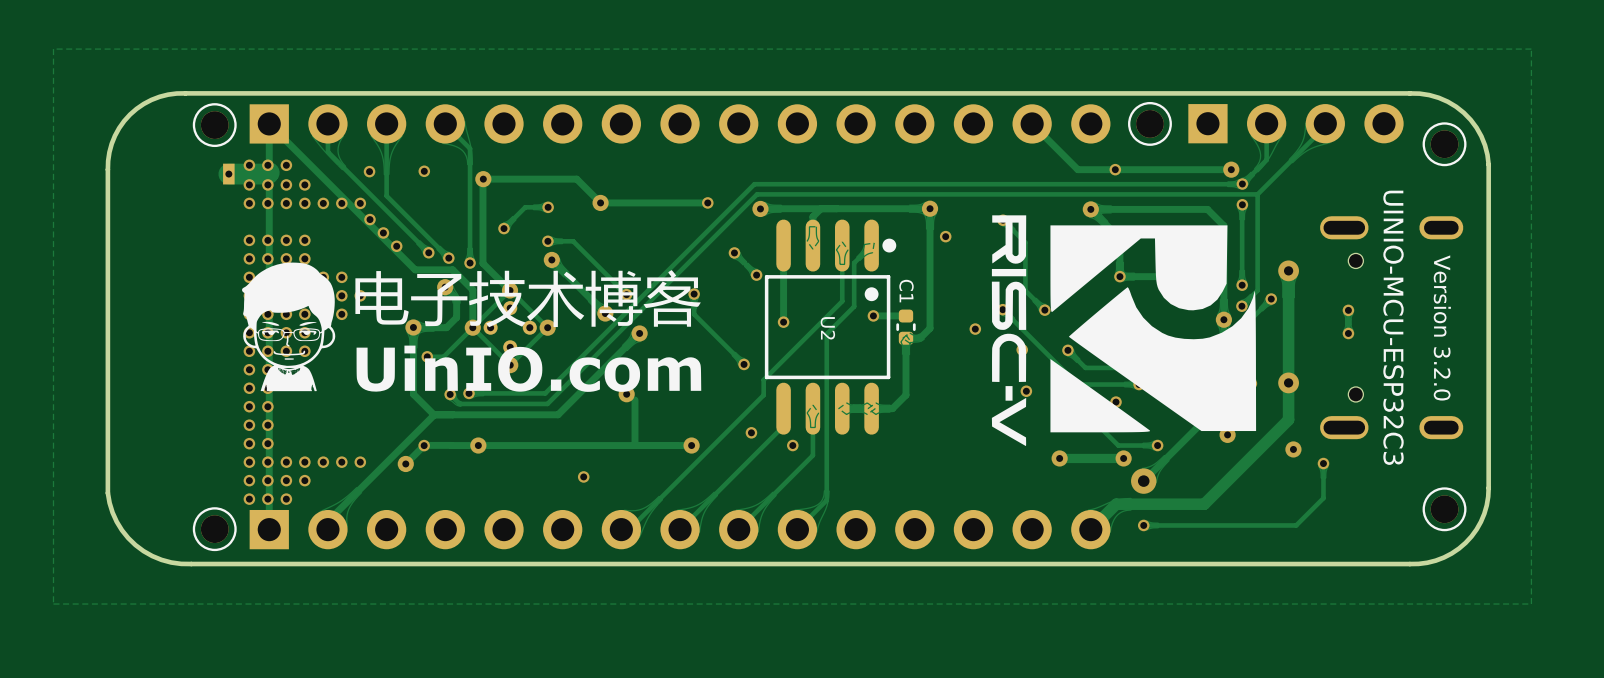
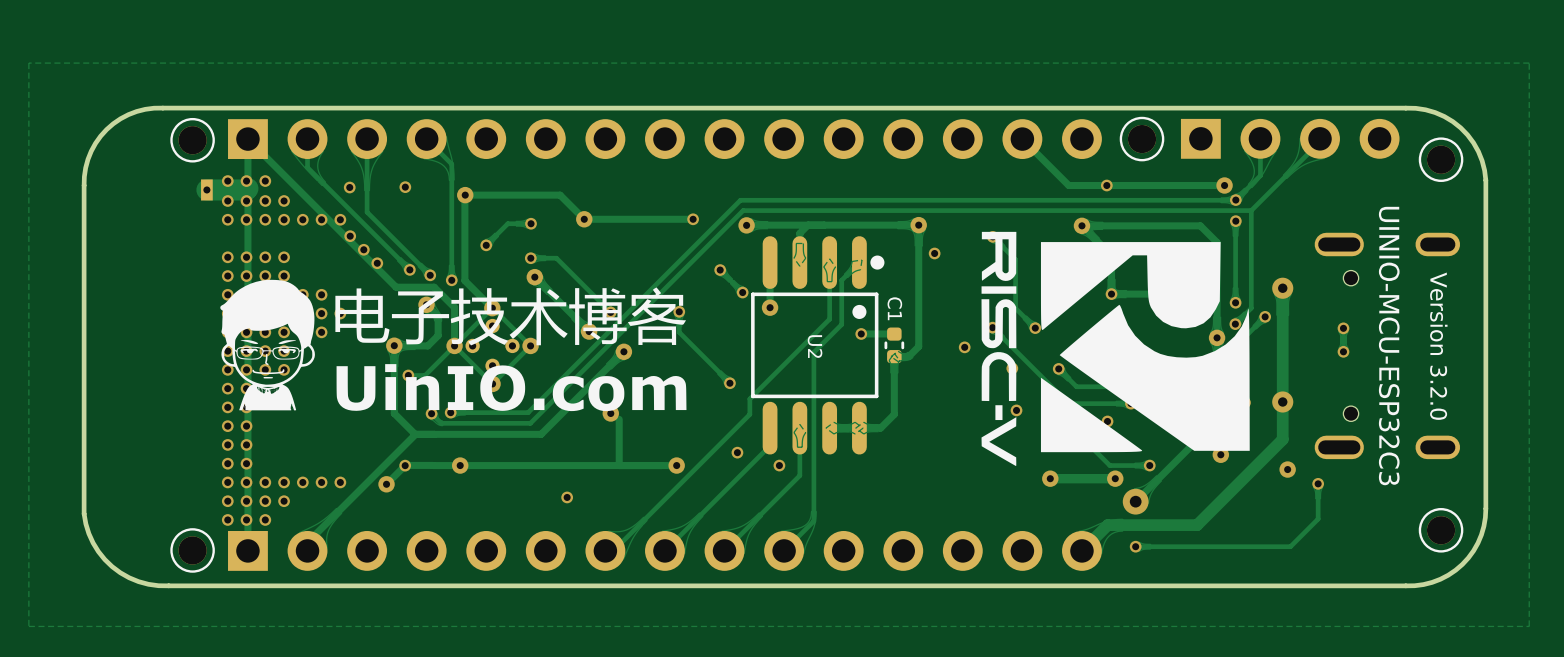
track: (783, 290) (783, 322) -> none
via: none -> (770, 307)
via: (783, 322) -> none

